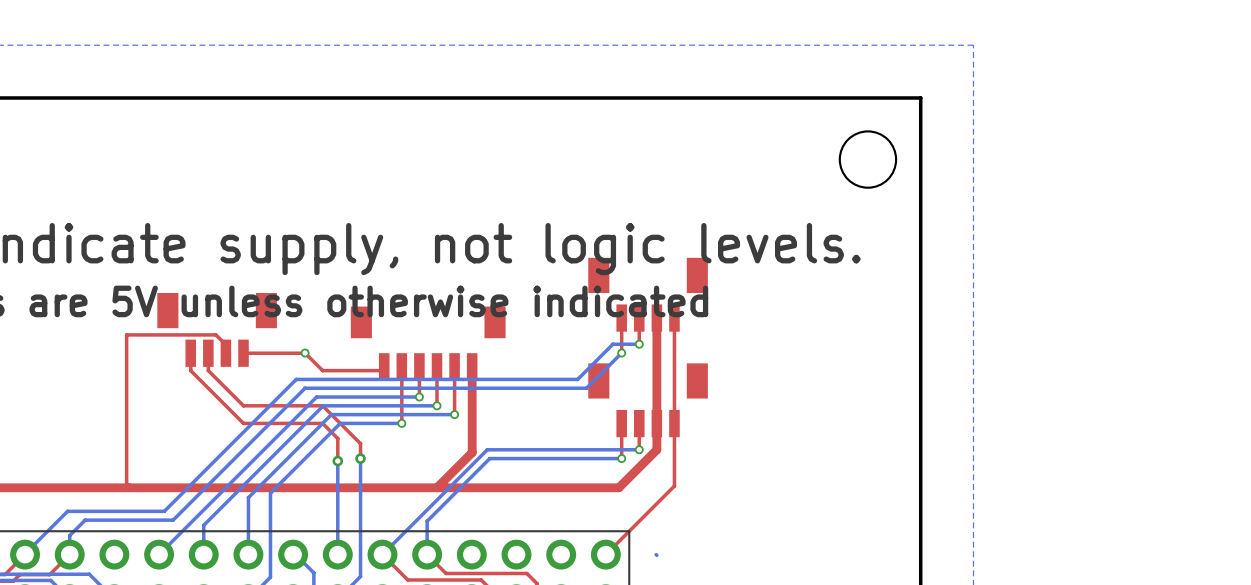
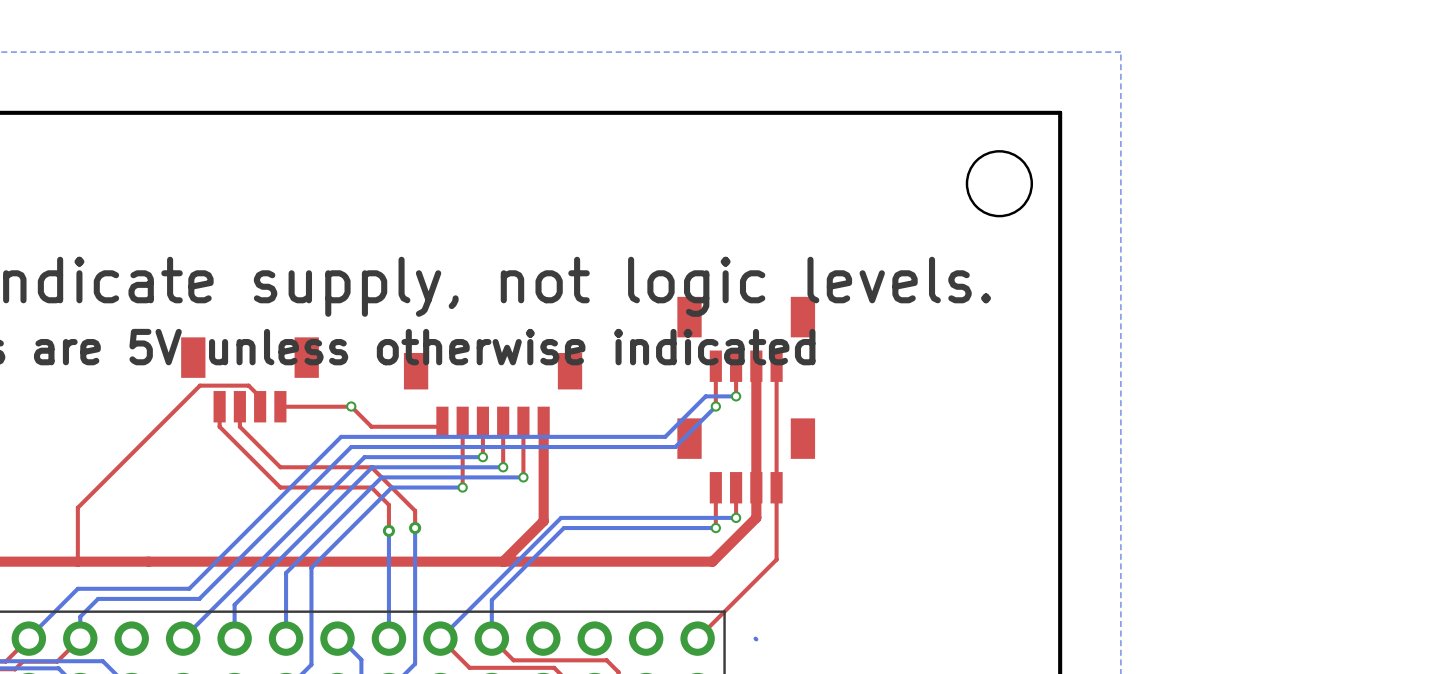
top track: (173, 334) (126, 334) (126, 485) -> (199, 385) (77, 507) (77, 561)

